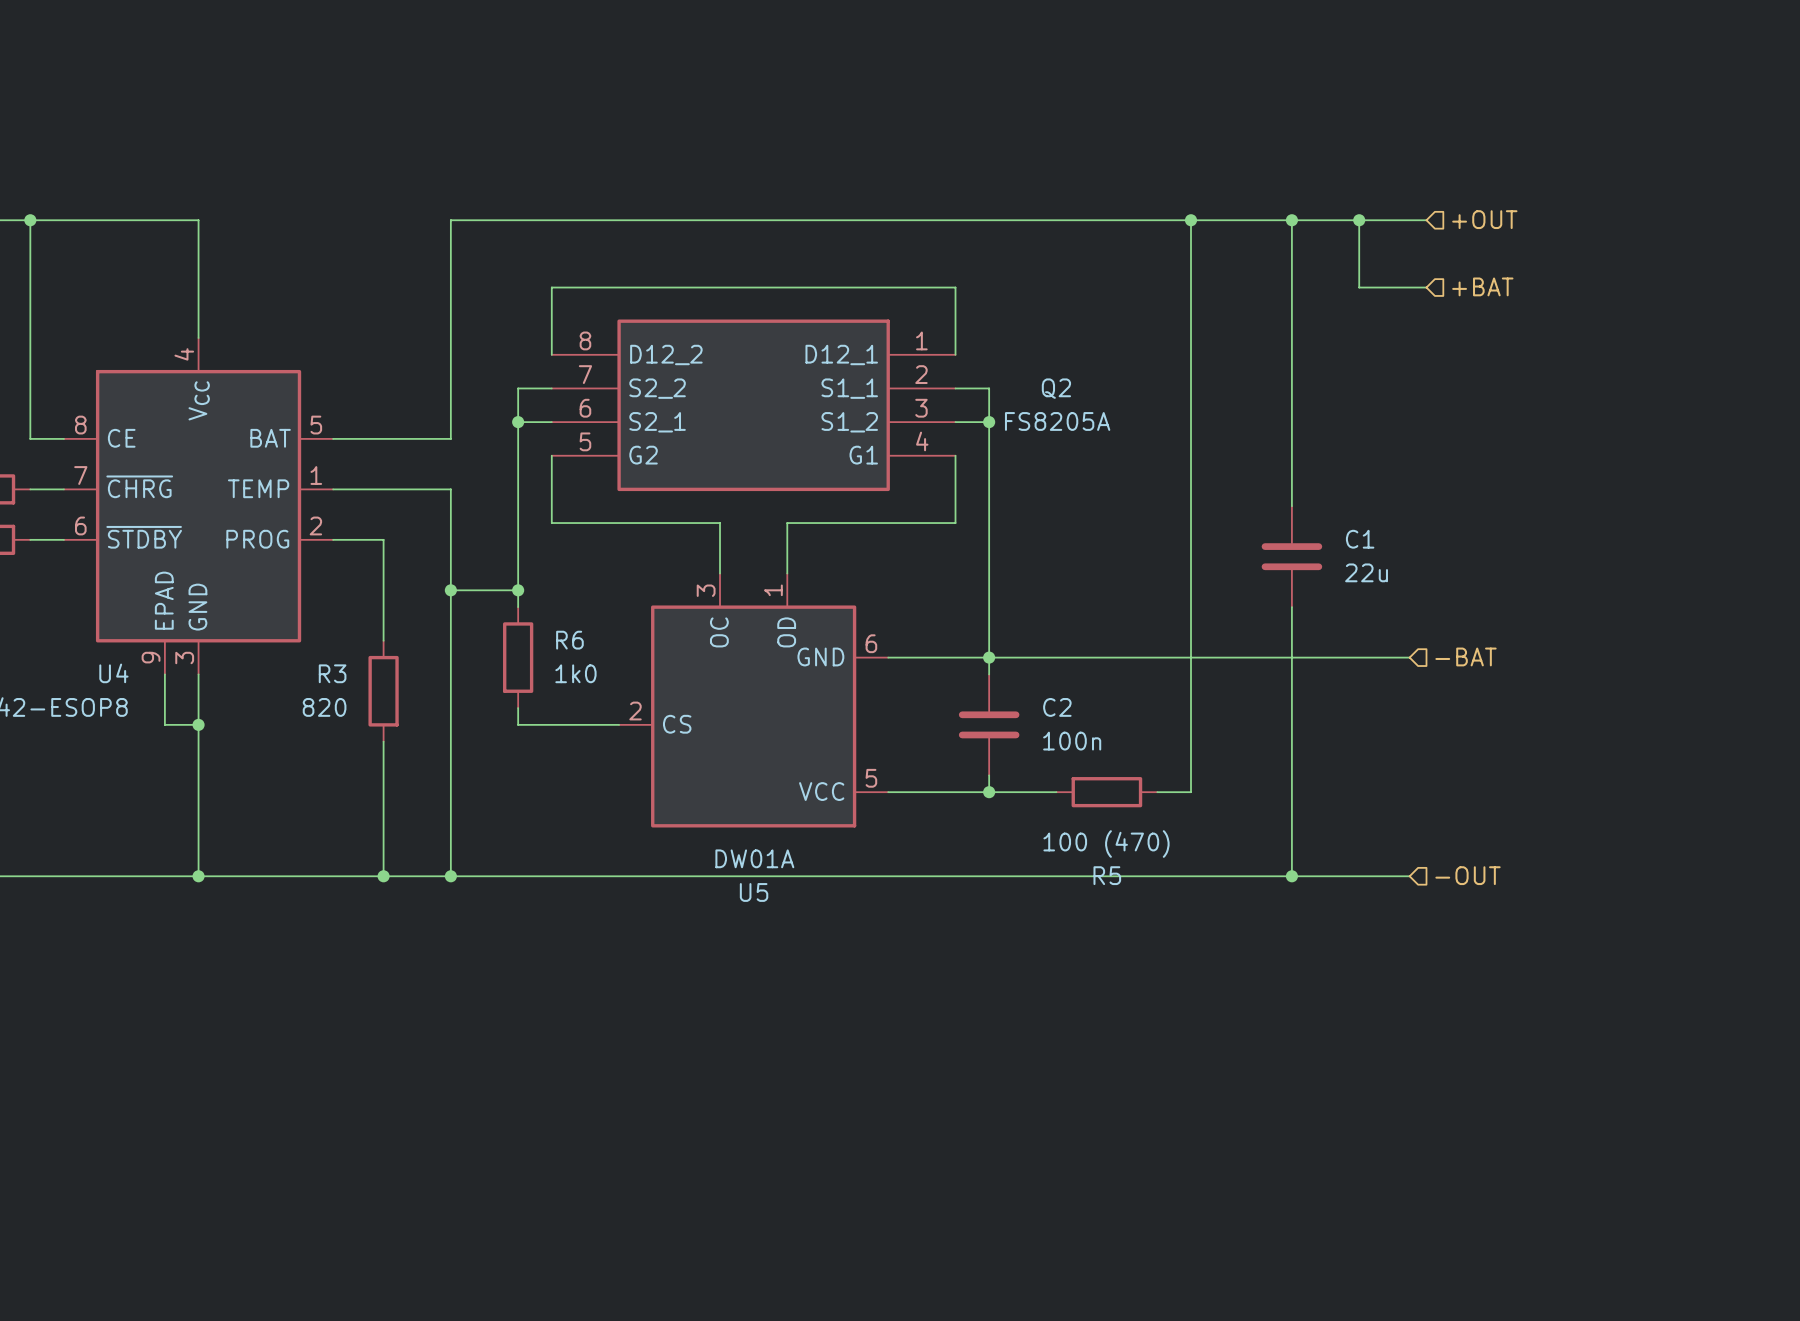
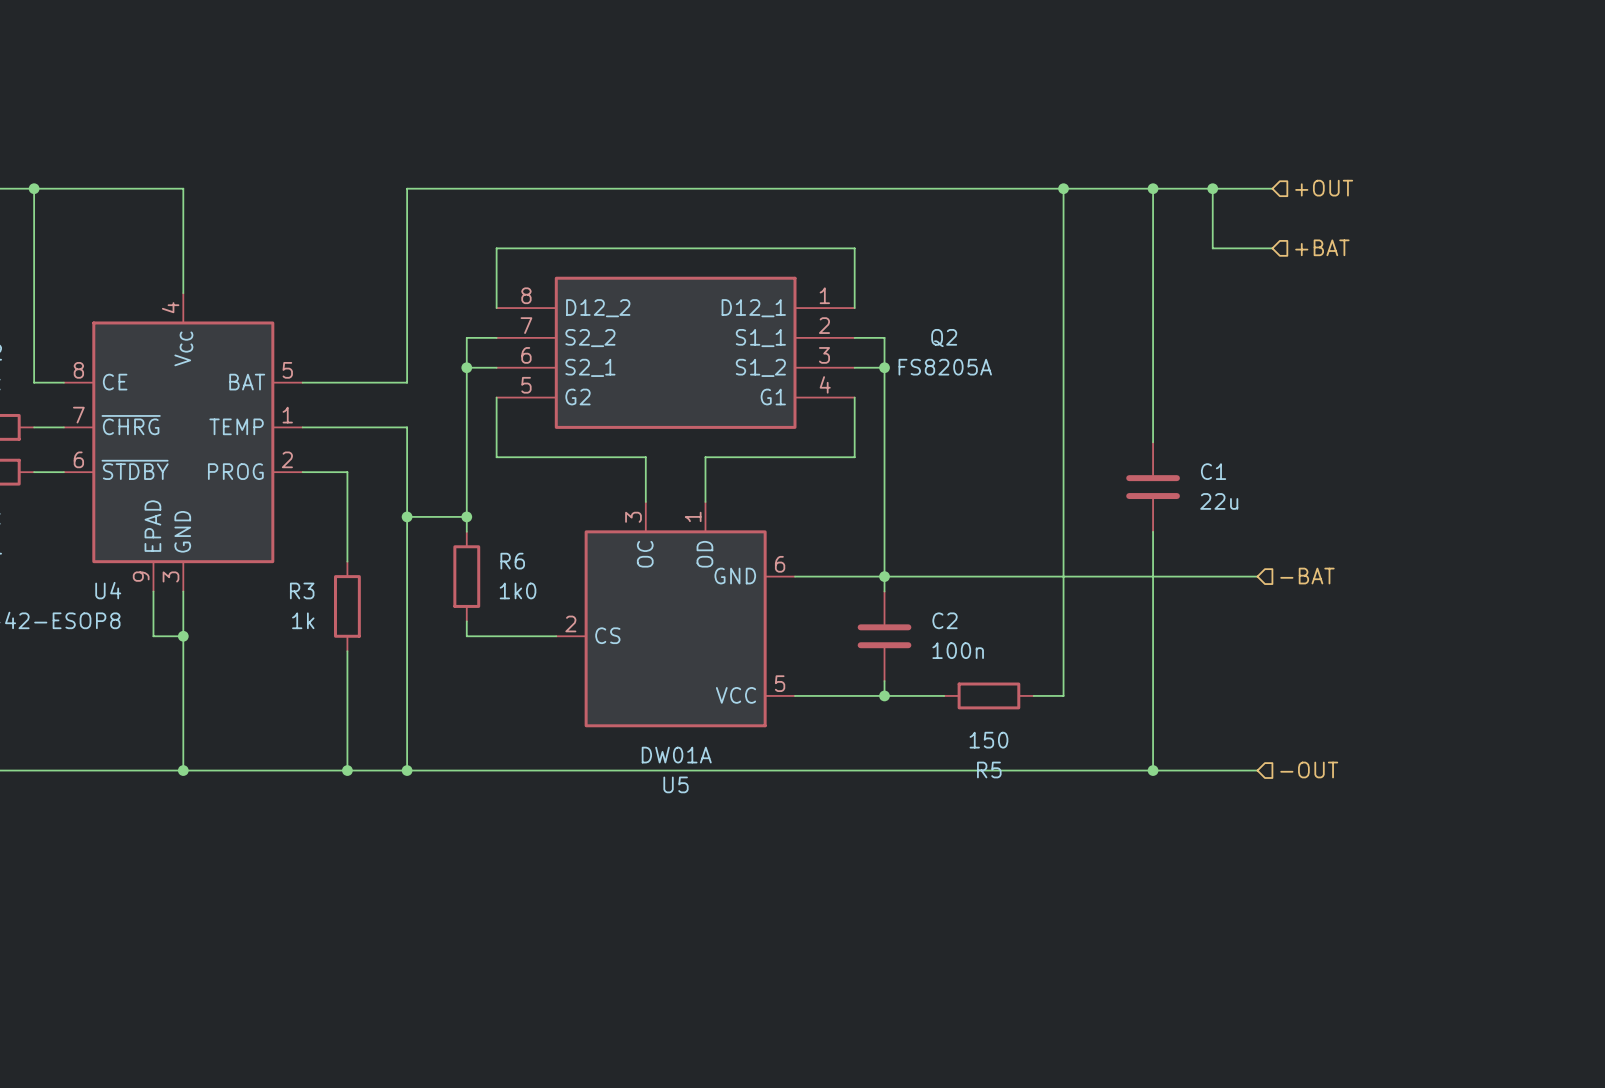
R3 value: 820 (324, 707) -> 1k (303, 620)
R5 value: 100 (470) (1106, 844) -> 150 (988, 740)

